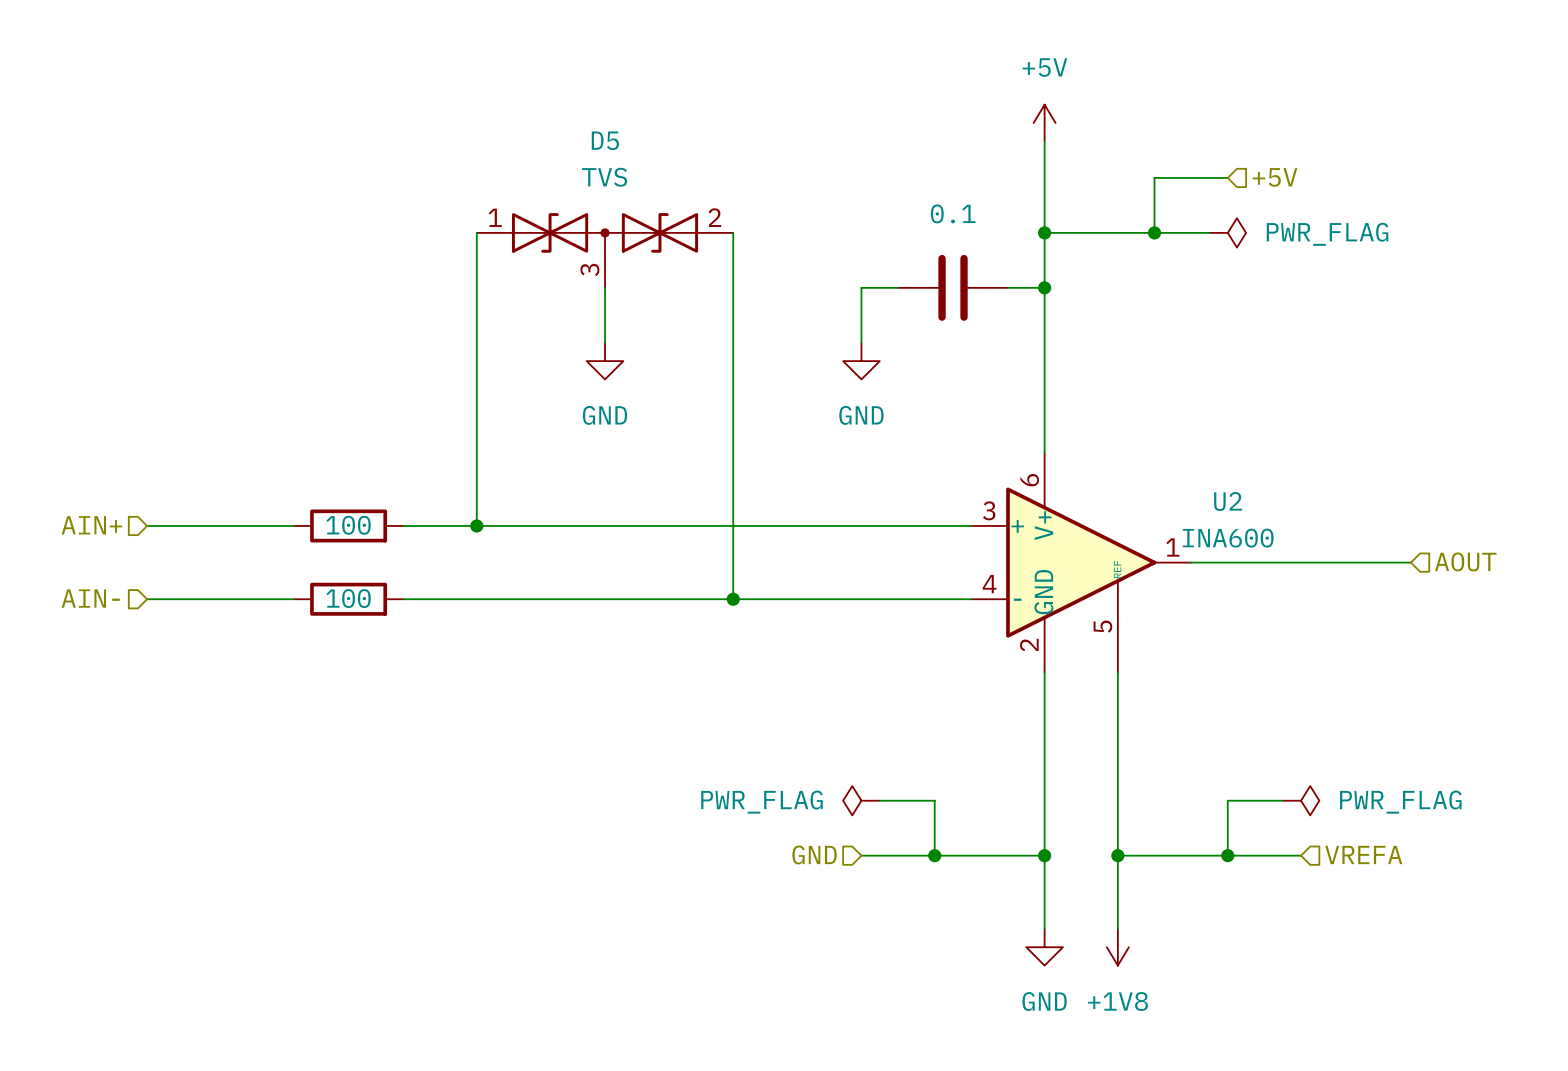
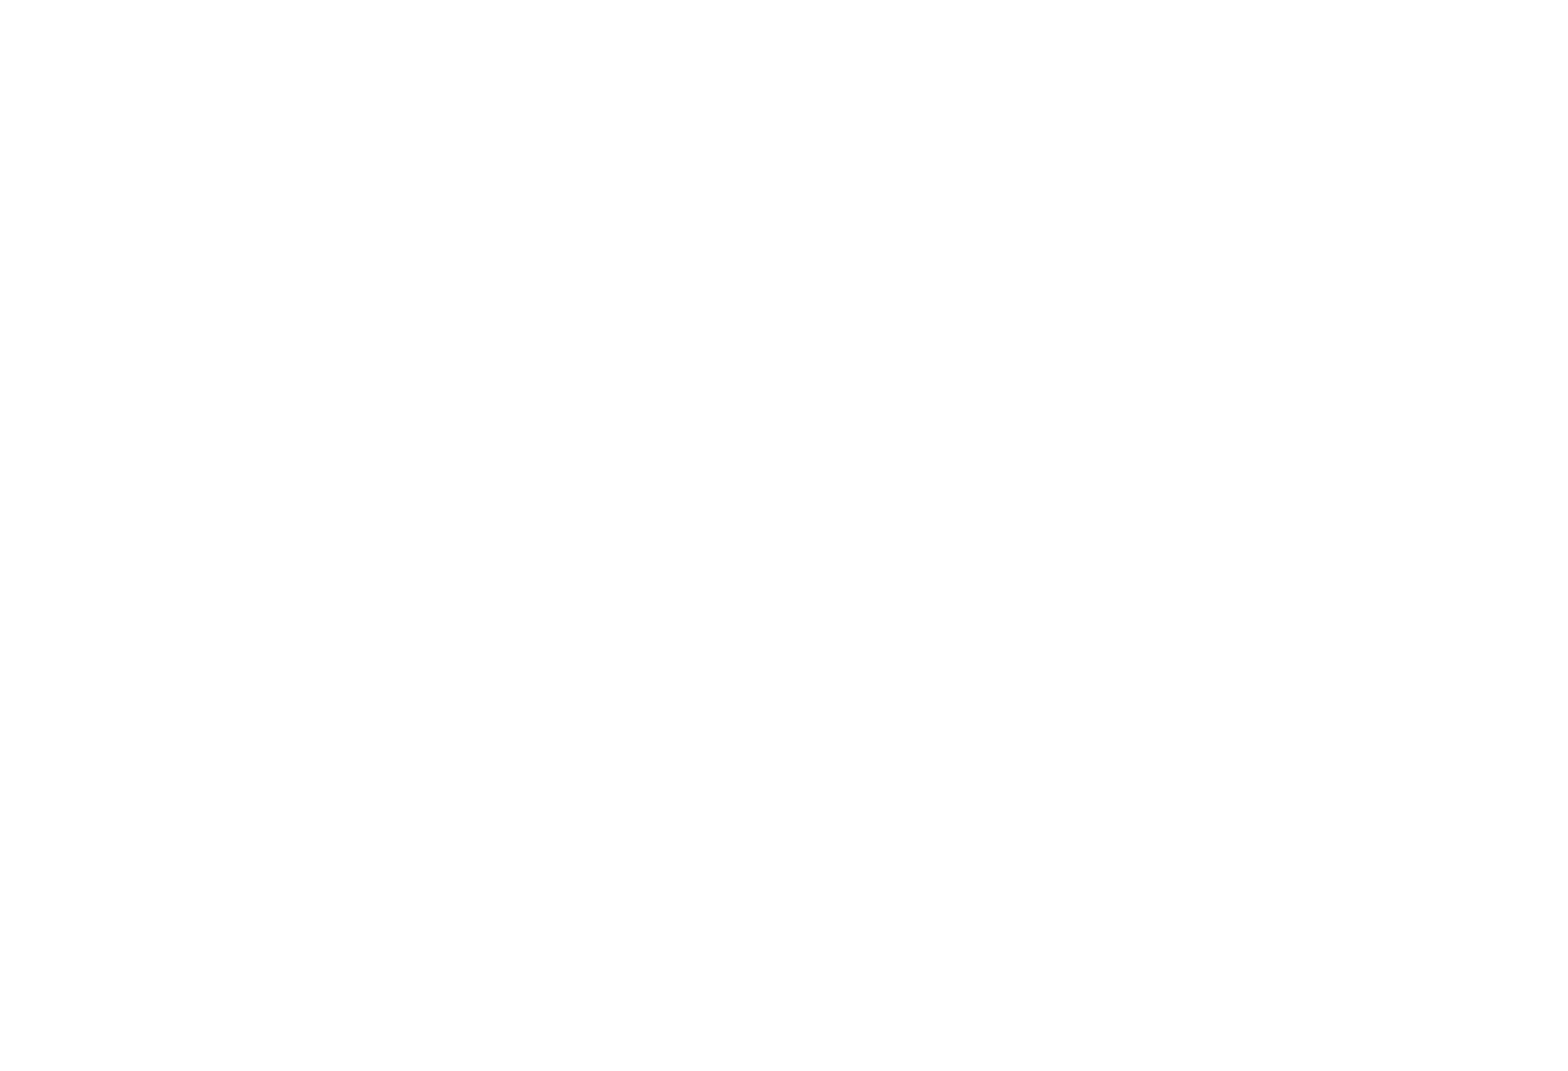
power symbol: +5V (1044, 123) -> none
wire: (1044, 141) (1044, 452) -> none
wire: (1227, 177) (1154, 177) (1154, 232) -> none
hierarchical label: +5V (1275, 177) -> none
wire: (476, 232) (476, 525) -> none
wire: (733, 232) (733, 599) -> none
wire: (1044, 232) (1209, 232) -> none
junction: (1044, 232) -> none
junction: (1154, 232) -> none
power symbol: PWR_FLAG (1227, 232) -> none
D5: TVS (605, 250) -> none
wire: (605, 287) (605, 342) -> none
wire: (898, 287) (861, 287) (861, 342) -> none
part: 0.1 (953, 287) -> none
wire: (1007, 287) (1044, 287) -> none
junction: (1044, 287) -> none
power symbol: GND (605, 361) -> none
power symbol: GND (861, 361) -> none
hierarchical label: AIN+ (91, 525) -> none
wire: (147, 525) (293, 525) -> none
part: 100 (348, 525) -> none
wire: (403, 525) (971, 525) -> none
junction: (476, 525) -> none
hierarchical label: AOUT (1465, 561) -> none
U2: INA600 (1081, 562) -> none
wire: (1191, 562) (1410, 562) -> none
hierarchical label: AIN- (90, 598) -> none
wire: (147, 599) (293, 599) -> none
part: 100 (348, 599) -> none
wire: (403, 599) (971, 599) -> none
junction: (733, 599) -> none
wire: (1044, 672) (1044, 928) -> none
wire: (1117, 672) (1117, 928) -> none
power symbol: PWR_FLAG (861, 800) -> none
wire: (879, 800) (934, 800) (934, 855) -> none
wire: (1282, 800) (1227, 800) (1227, 855) -> none
power symbol: PWR_FLAG (1301, 800) -> none
hierarchical label: GND (814, 854) -> none
hierarchical label: VREFA (1363, 854) -> none
wire: (861, 855) (1044, 855) -> none
junction: (934, 855) -> none
junction: (1044, 855) -> none
wire: (1117, 855) (1301, 855) -> none
junction: (1117, 855) -> none
junction: (1227, 855) -> none
power symbol: GND (1044, 947) -> none
power symbol: +1V8 (1117, 947) -> none

